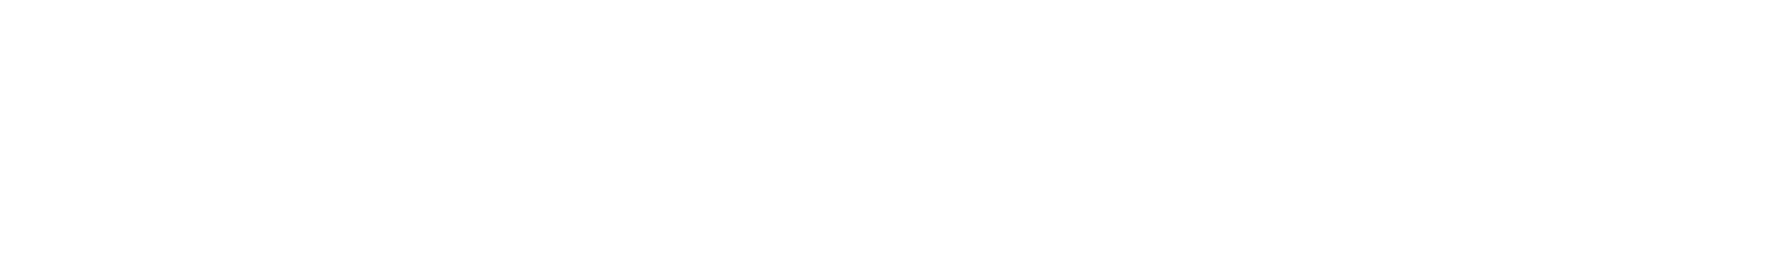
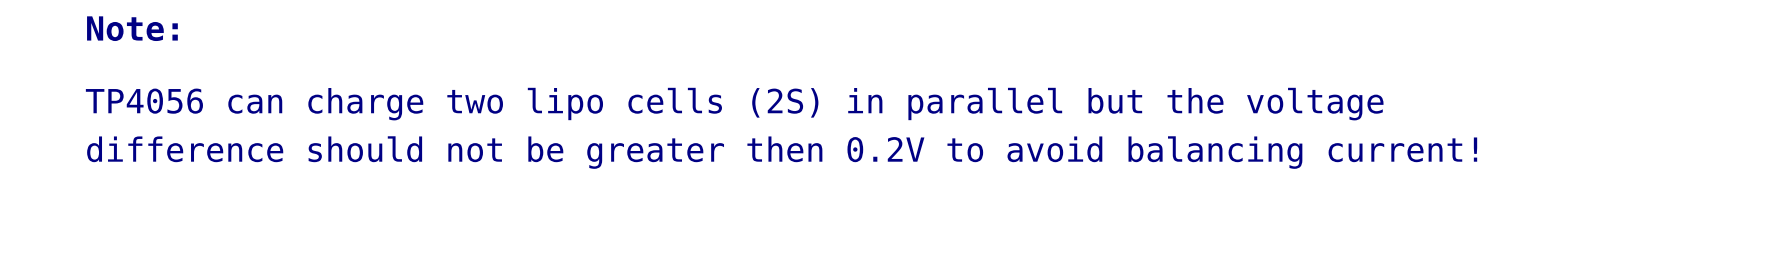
text: none -> Note: (132, 28)
text: none -> TP4056 can charge two lipo cells (2S) in parallel but the voltage (734, 104)
text: none -> difference should not be greater then 0.2V to avoid balancing current! (782, 152)

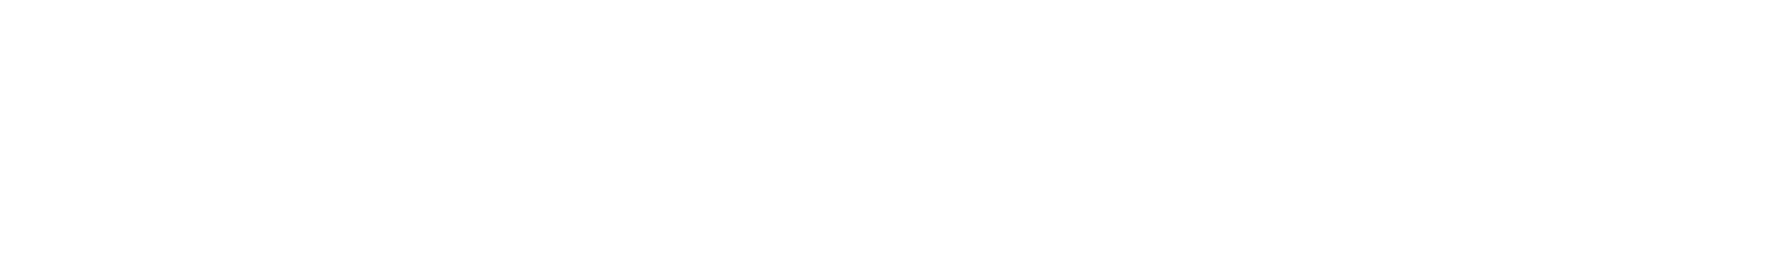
text: Note: (132, 28) -> none
text: TP4056 can charge two lipo cells (2S) in parallel but the voltage (734, 104) -> none
text: difference should not be greater then 0.2V to avoid balancing current! (782, 152) -> none

